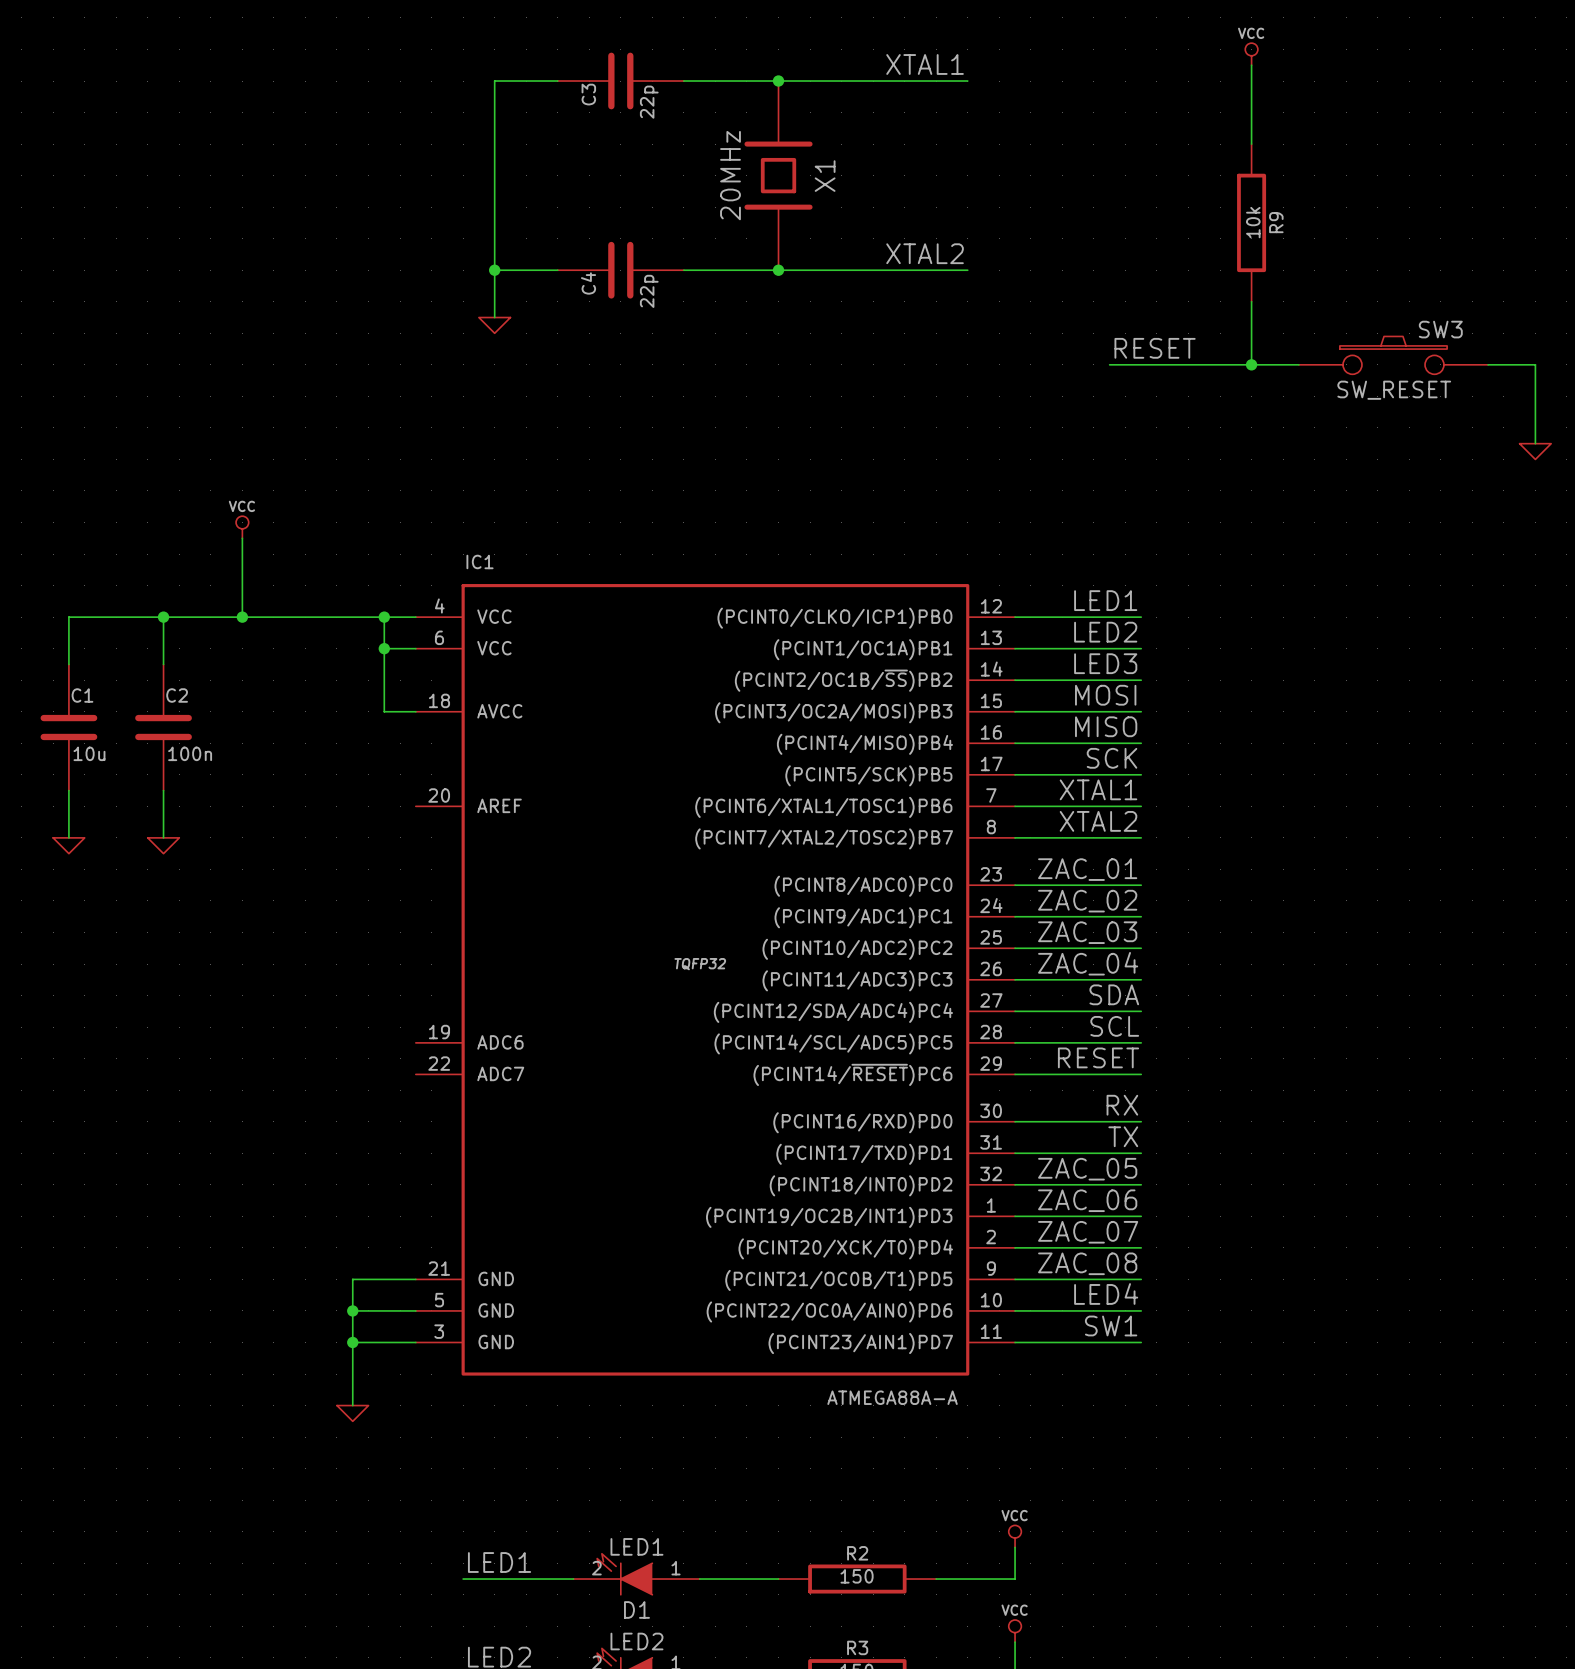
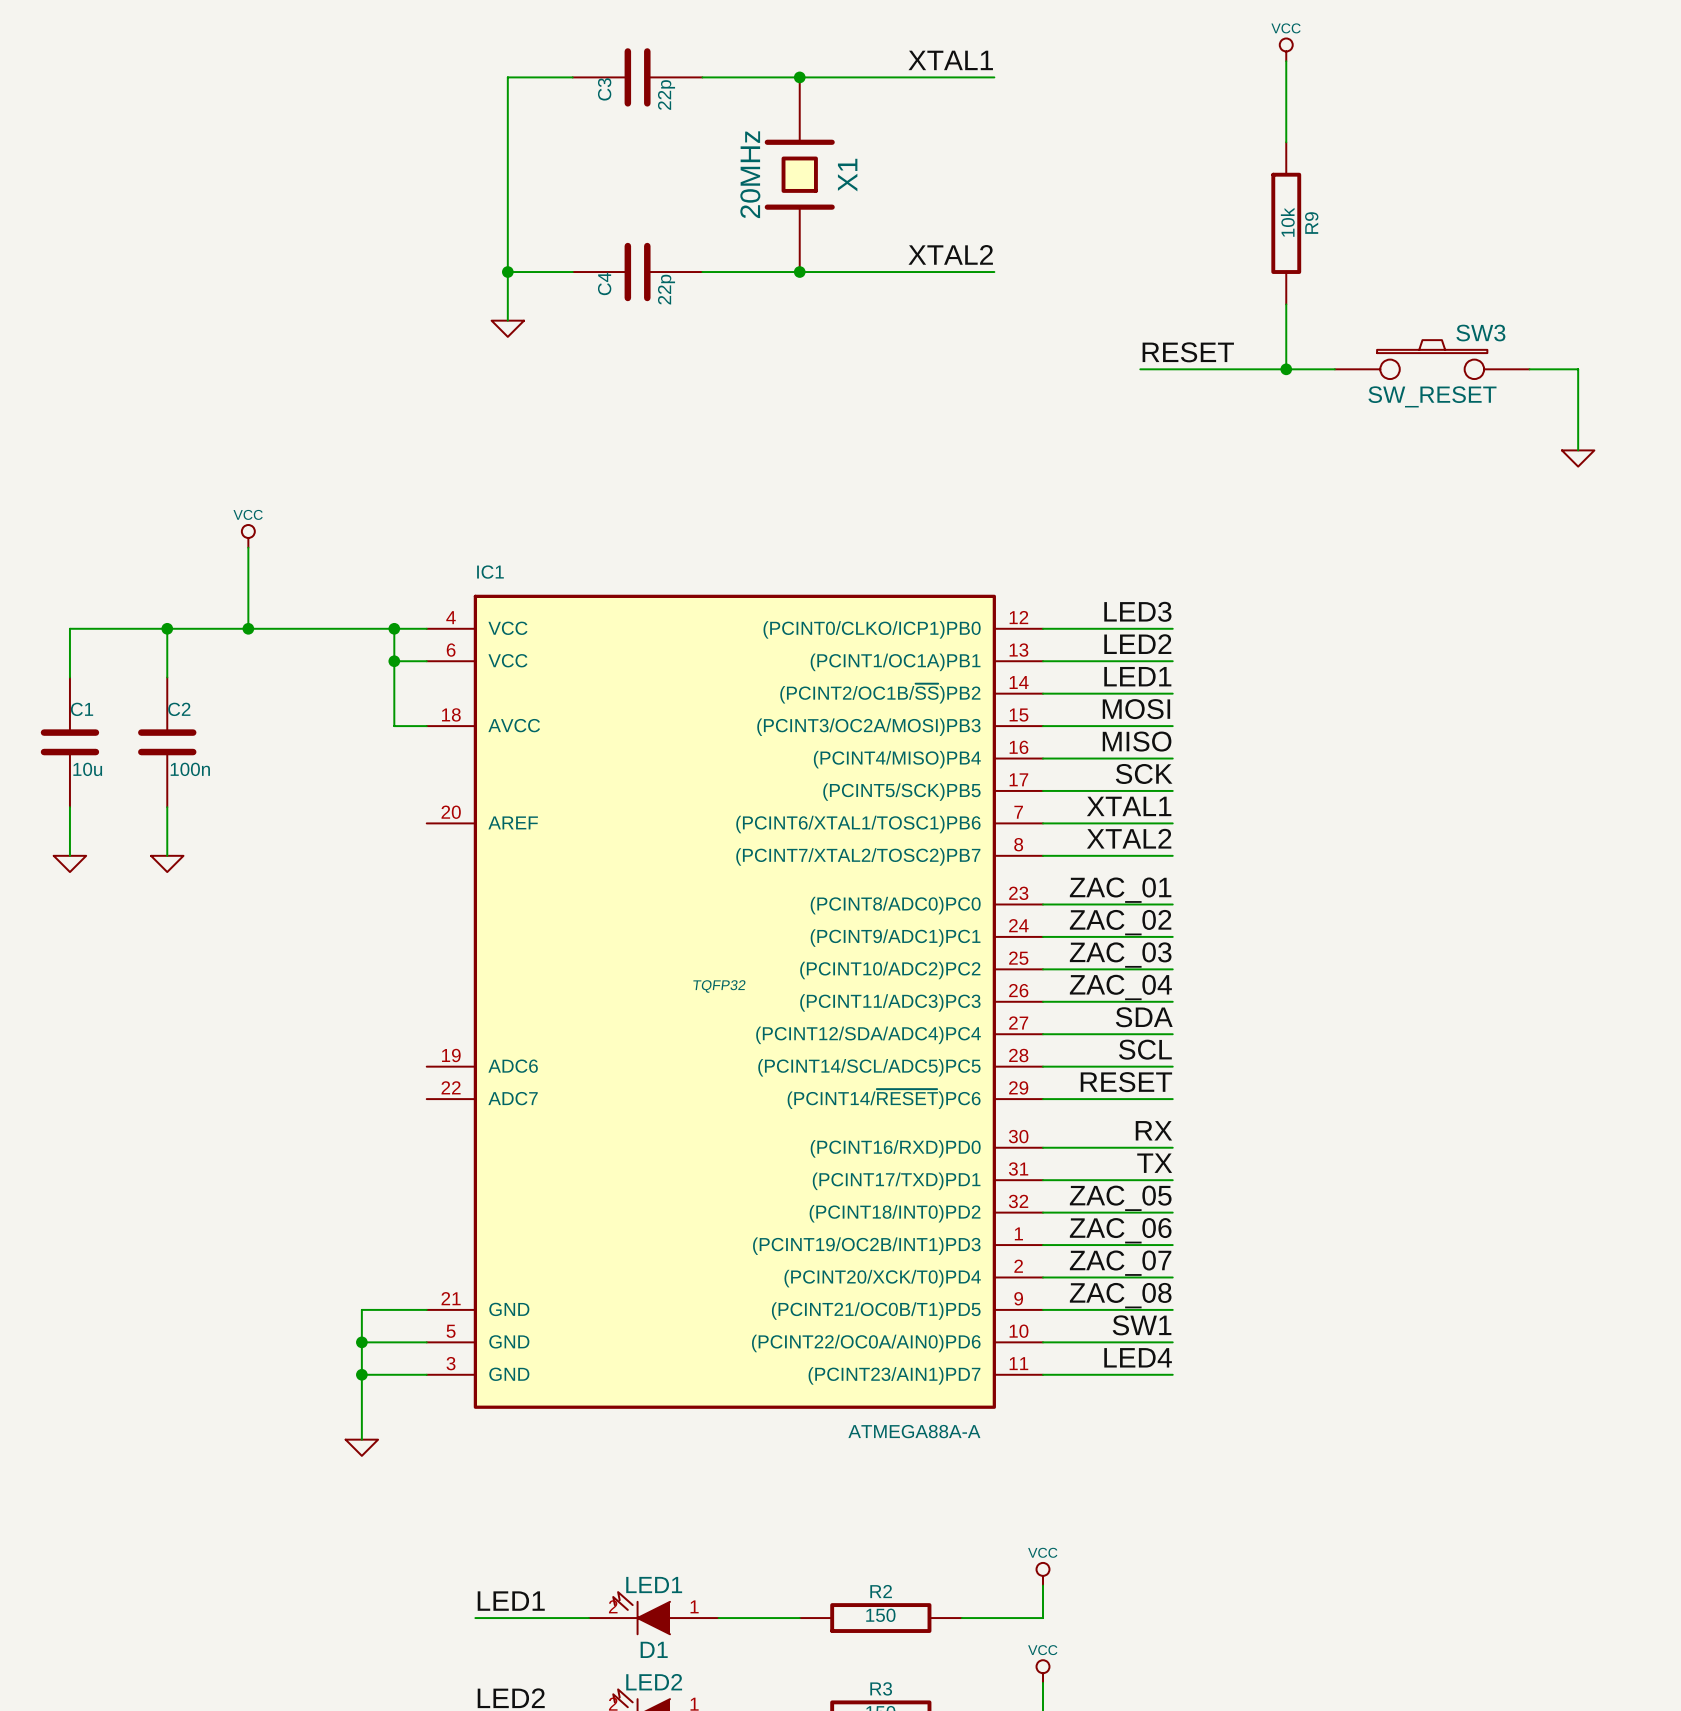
label: LED1 (1105, 600) -> LED3 (1137, 611)
label: LED3 (1105, 663) -> LED1 (1137, 676)
label: LED4 (1106, 1293) -> SW1 (1142, 1325)
label: SW1 (1111, 1325) -> LED4 (1138, 1357)

